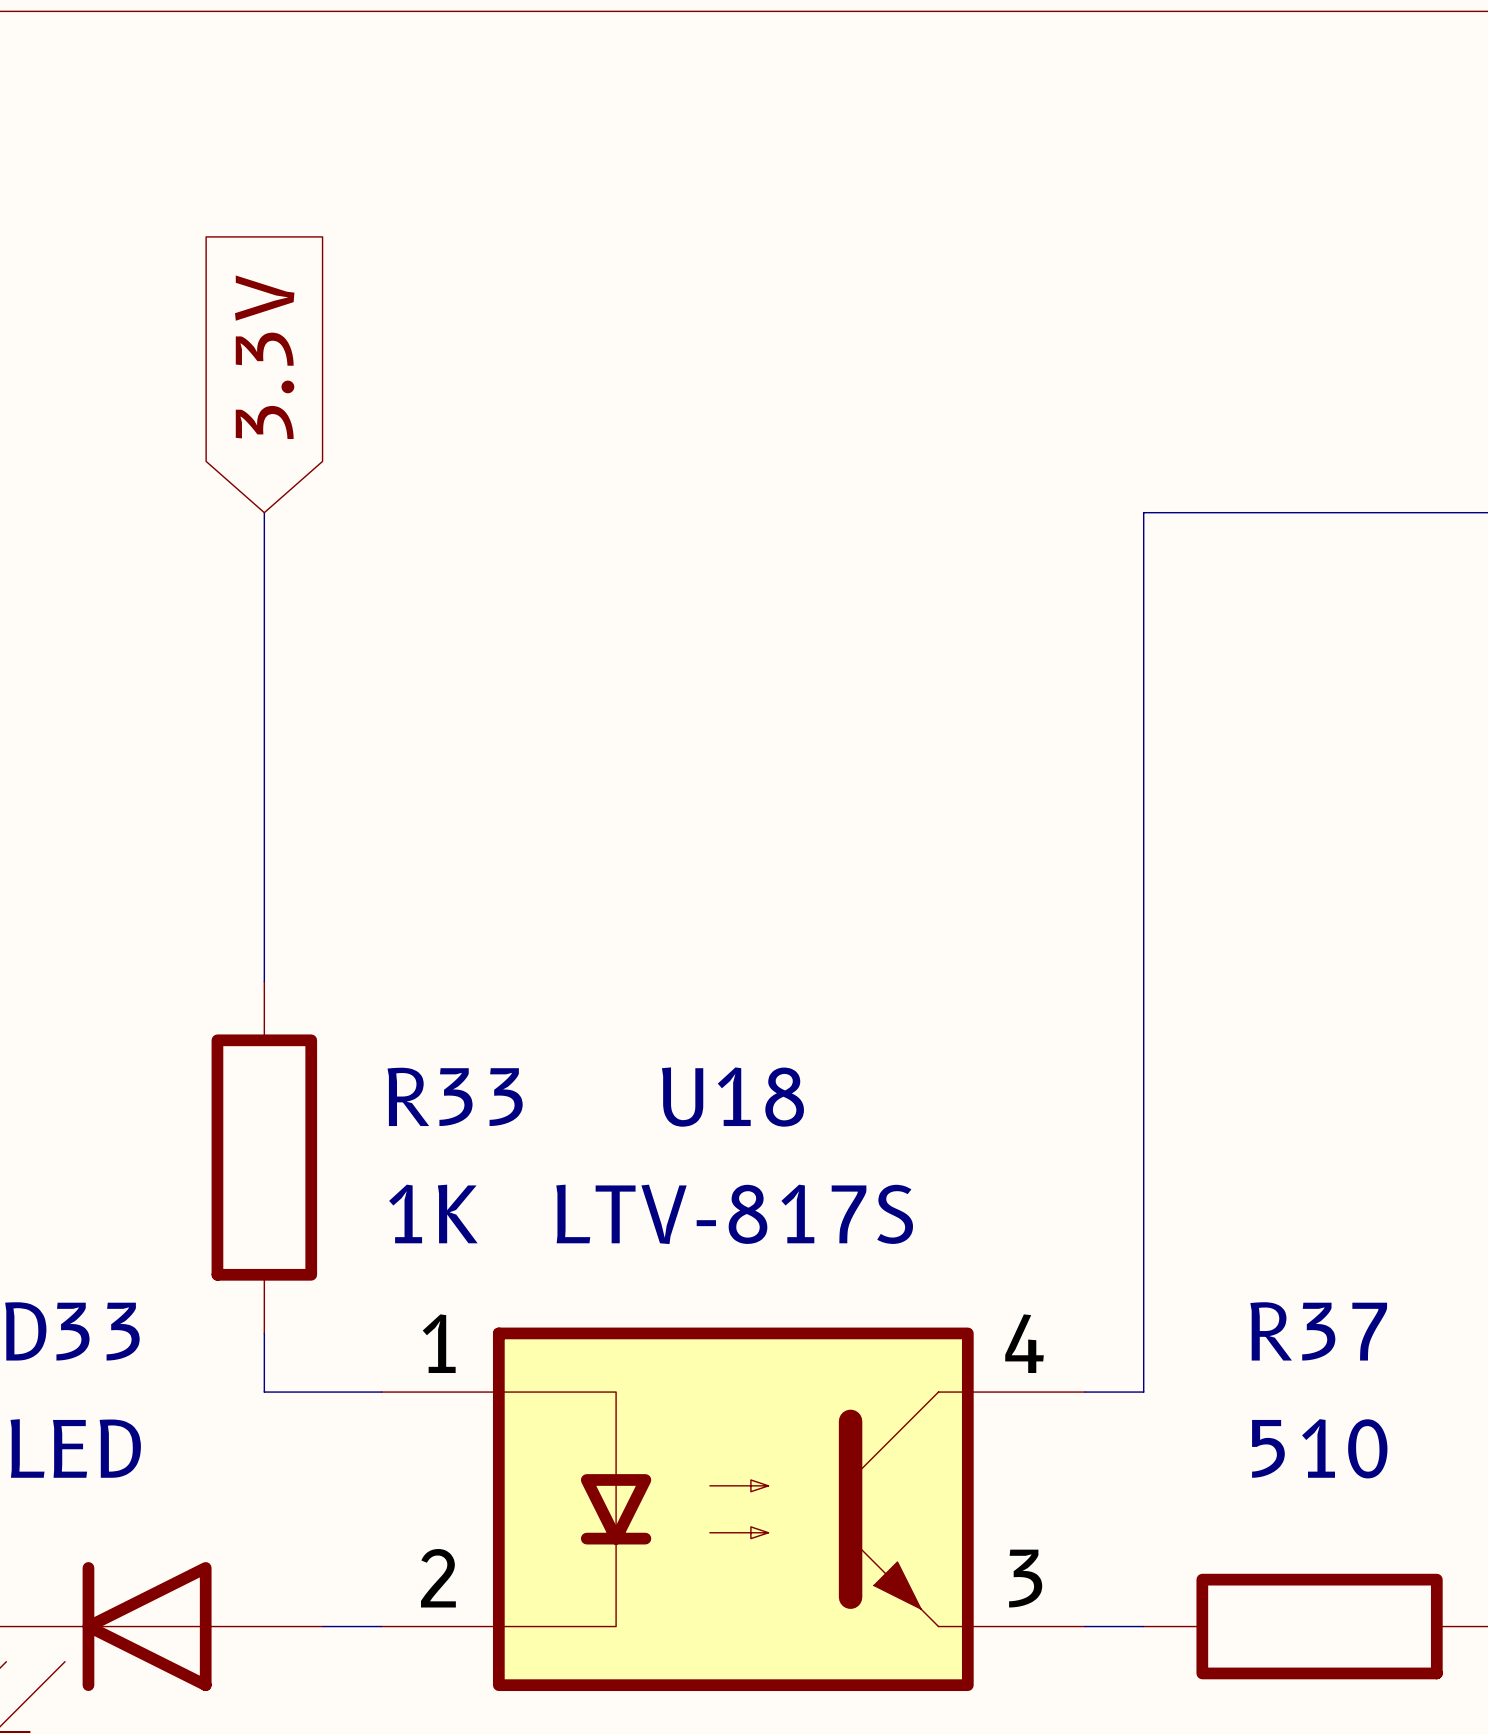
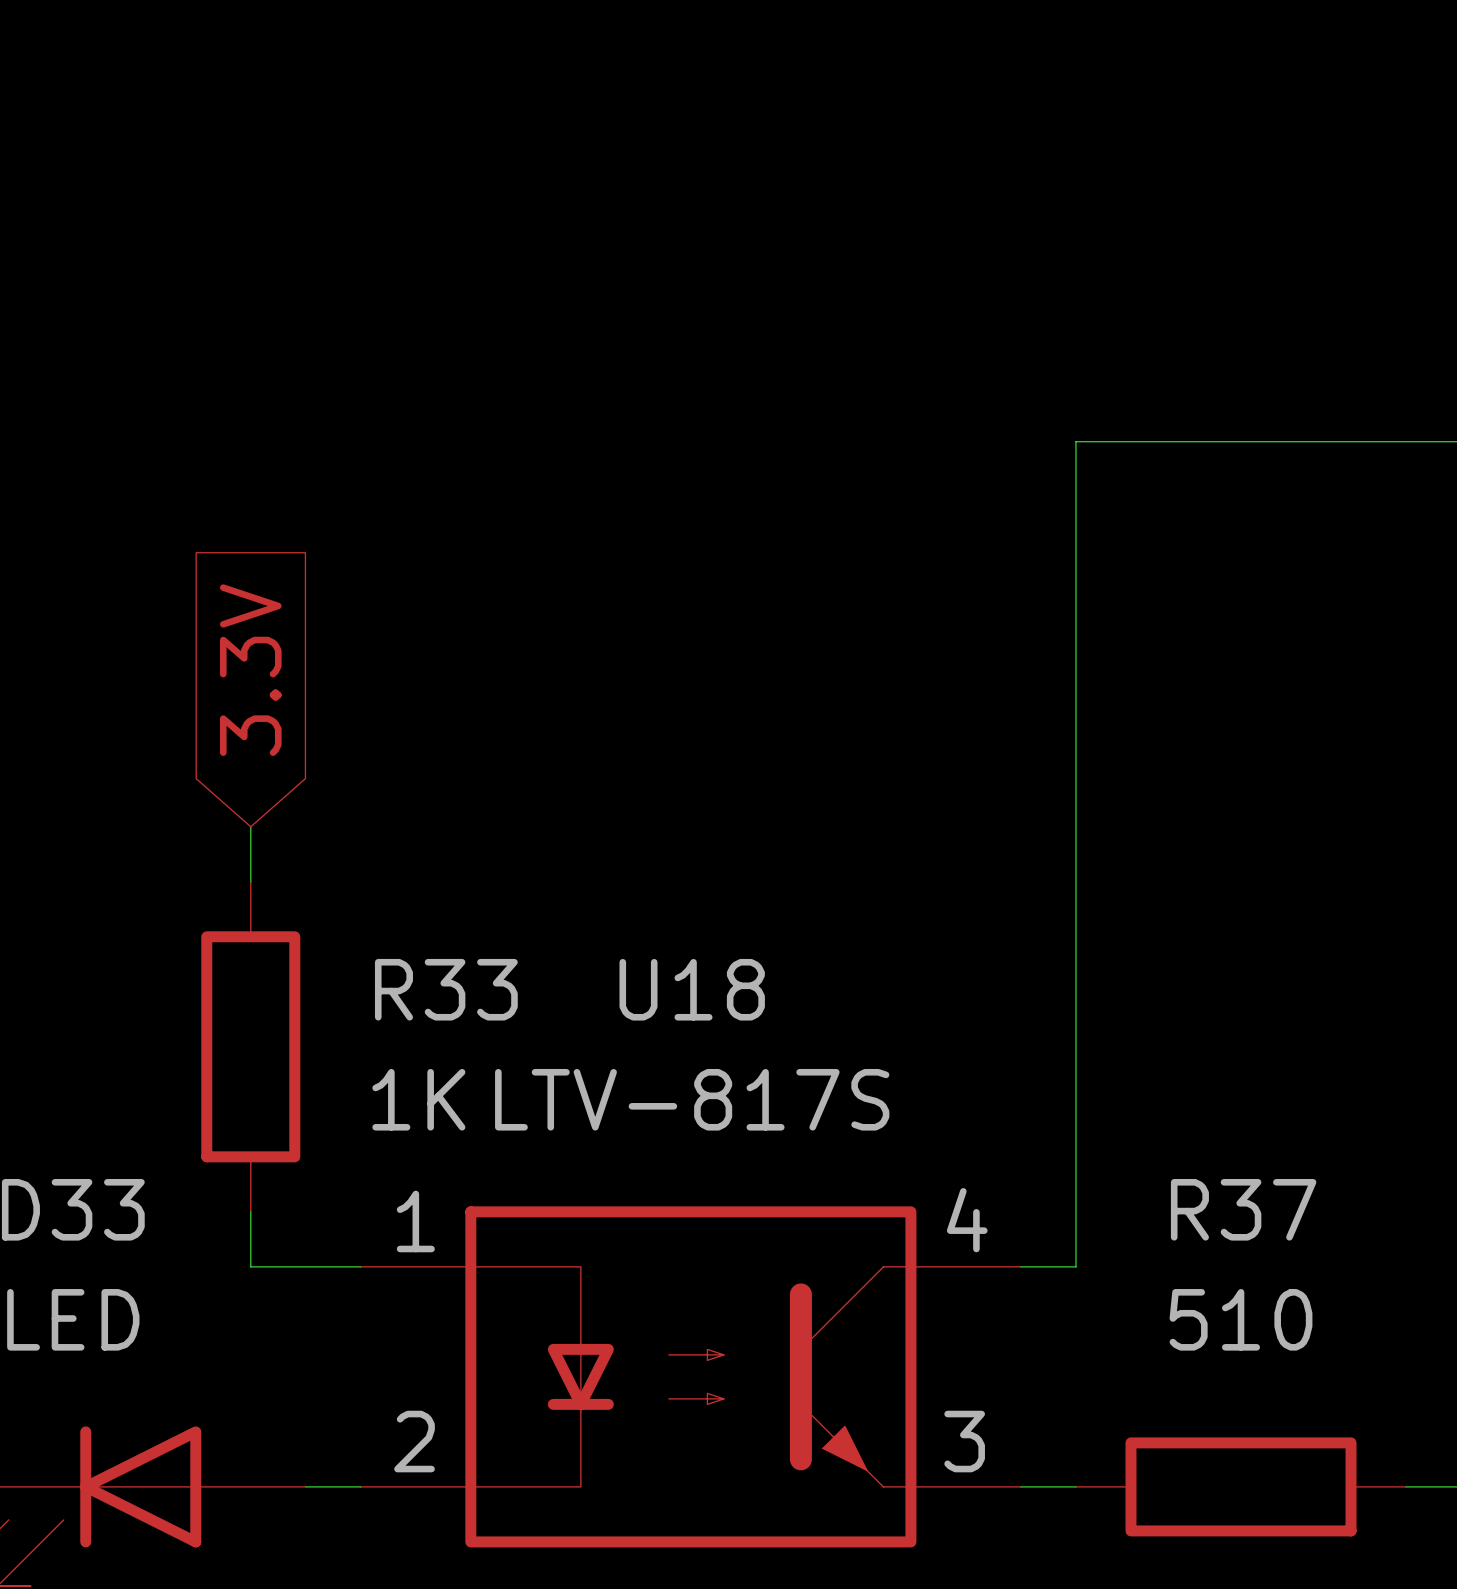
global label position: 3.3V (264, 357) -> 3.3V (250, 670)
wire: (264, 512) (264, 923) -> none

